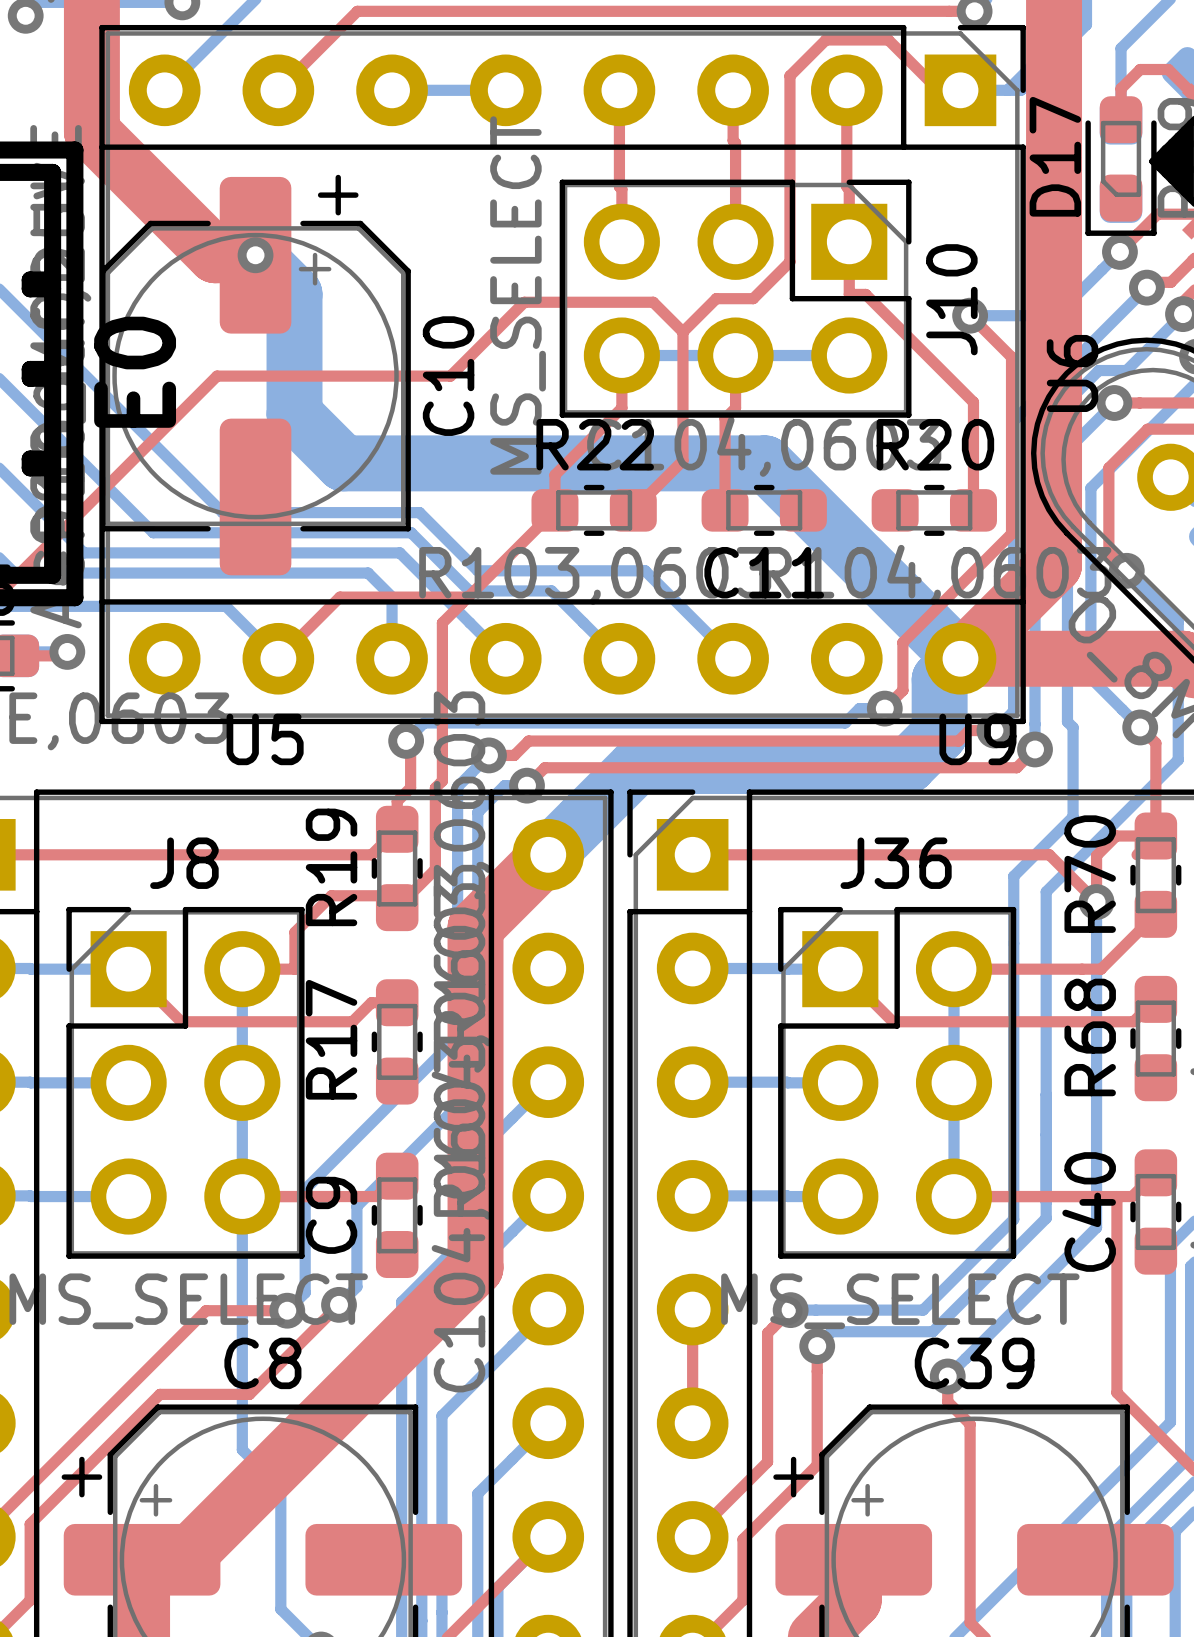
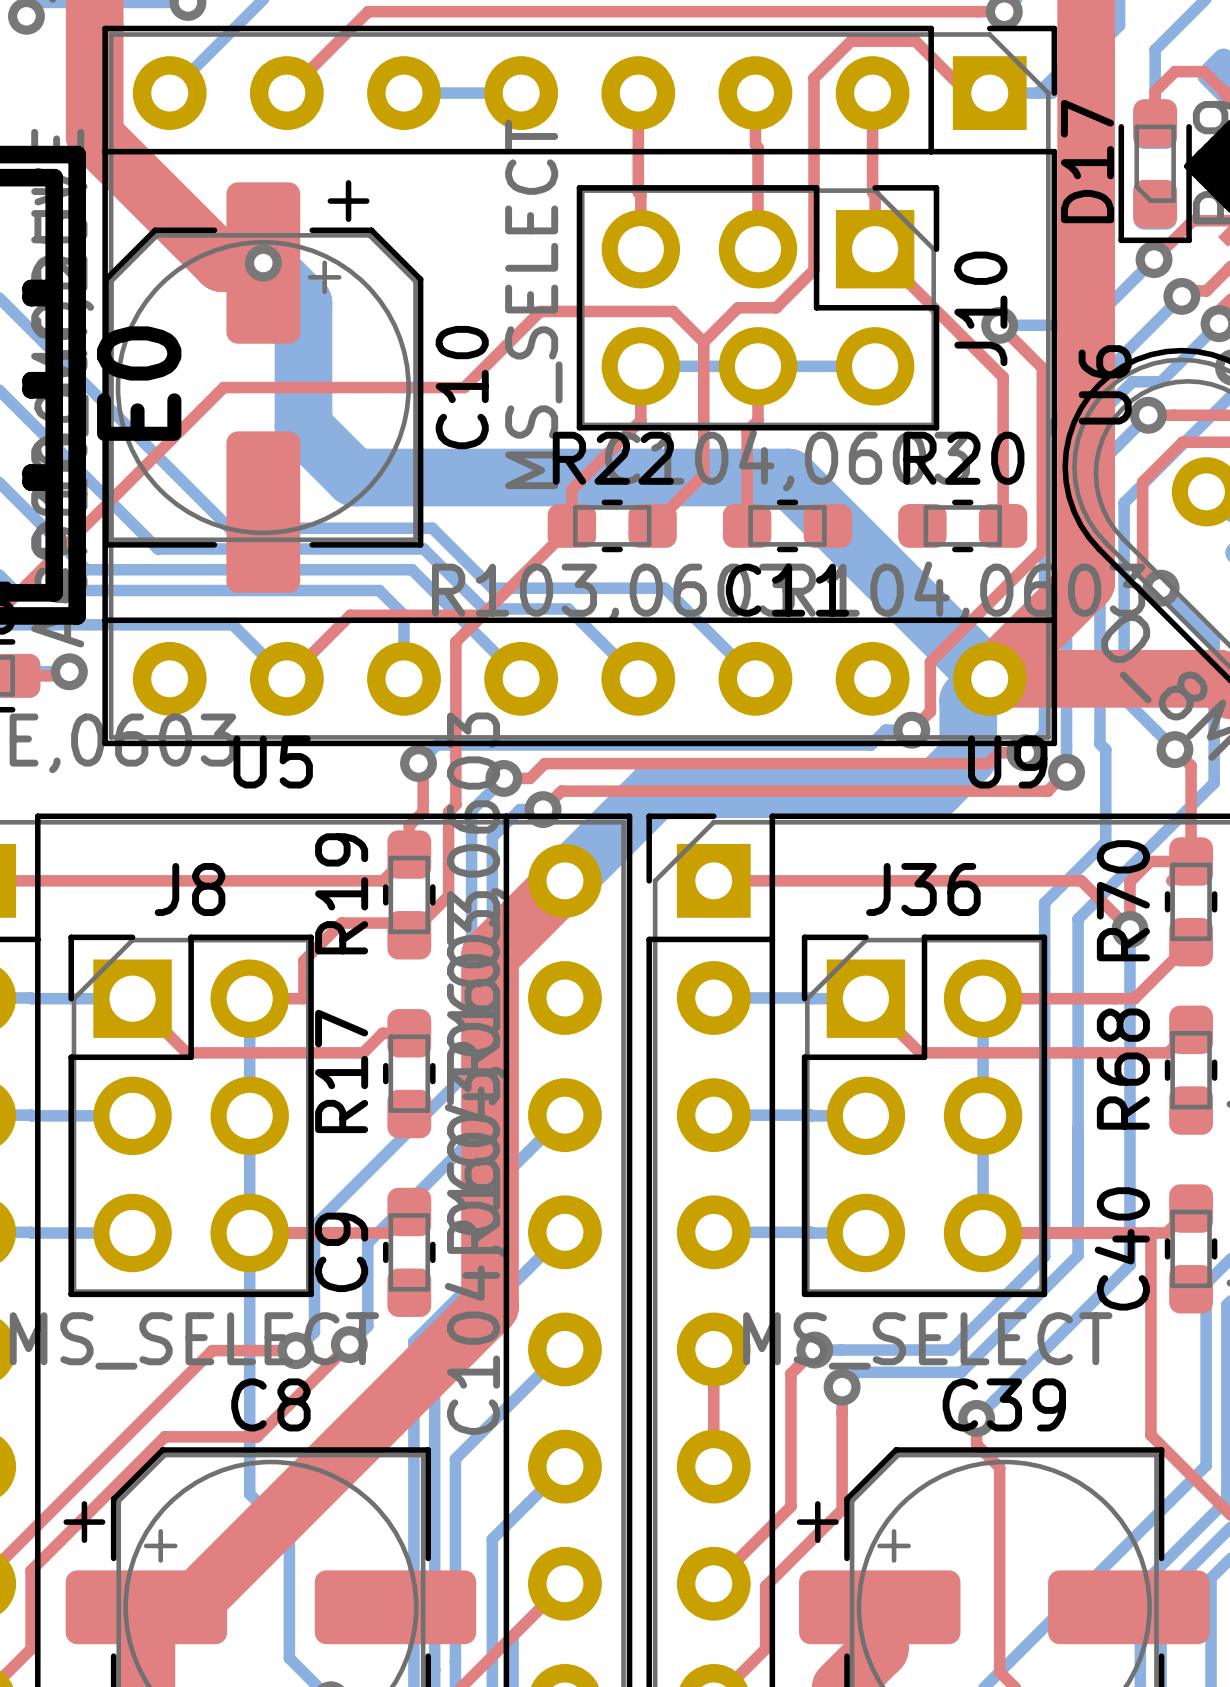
top track: (849, 241) (849, 294) (865, 294) (973, 402) -> (875, 249) (1003, 377) (1003, 414)

